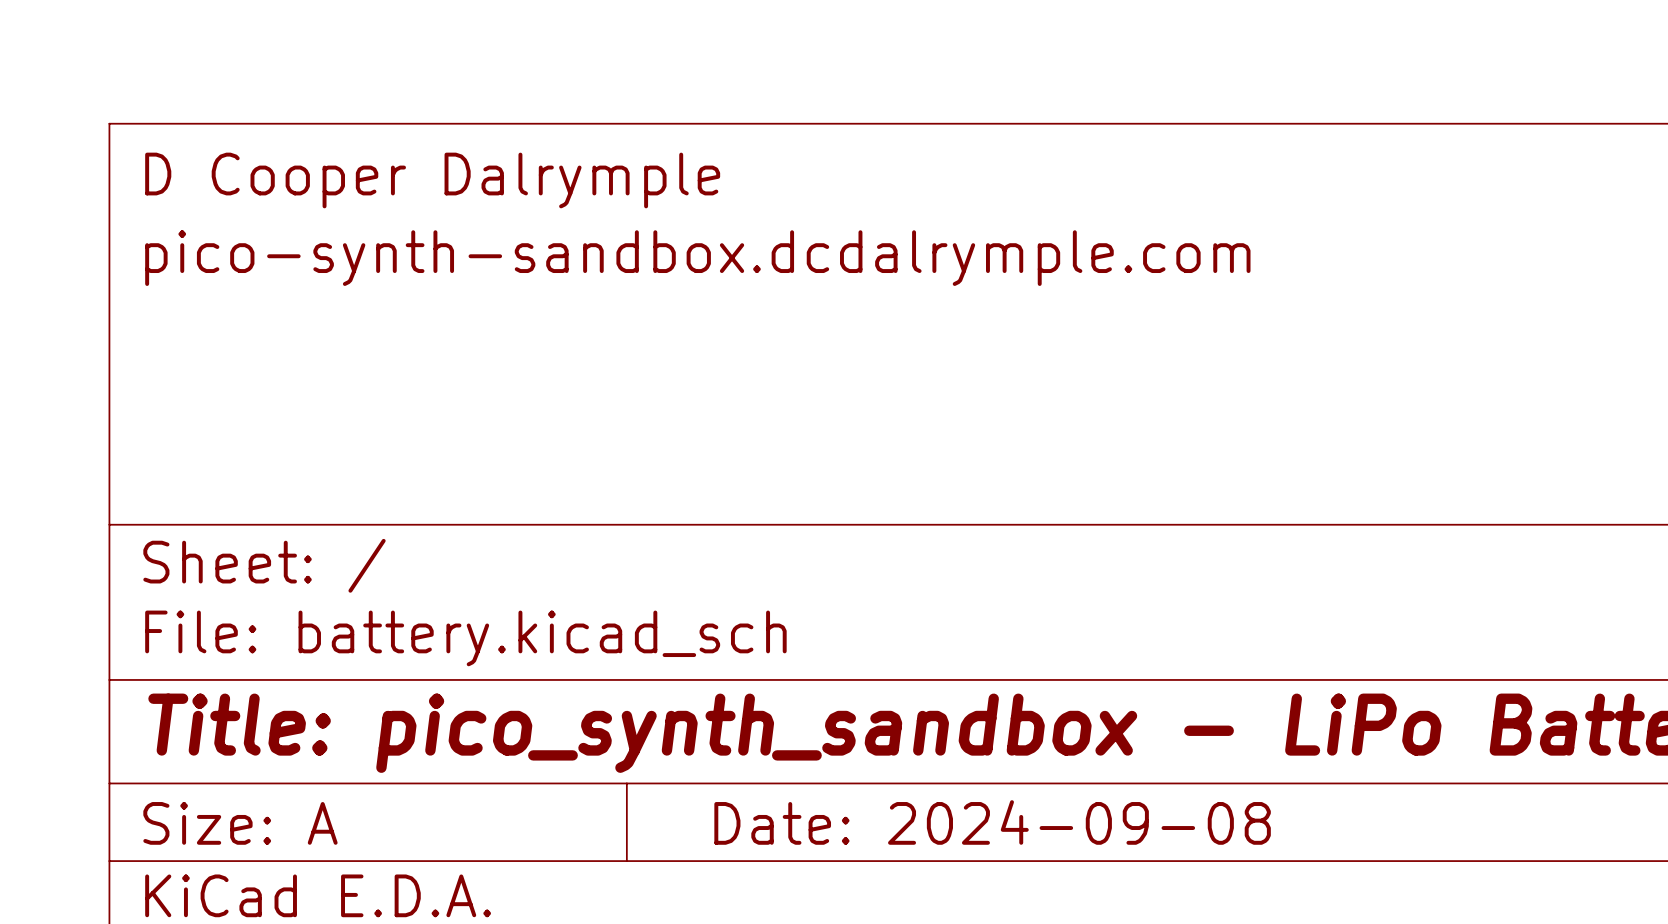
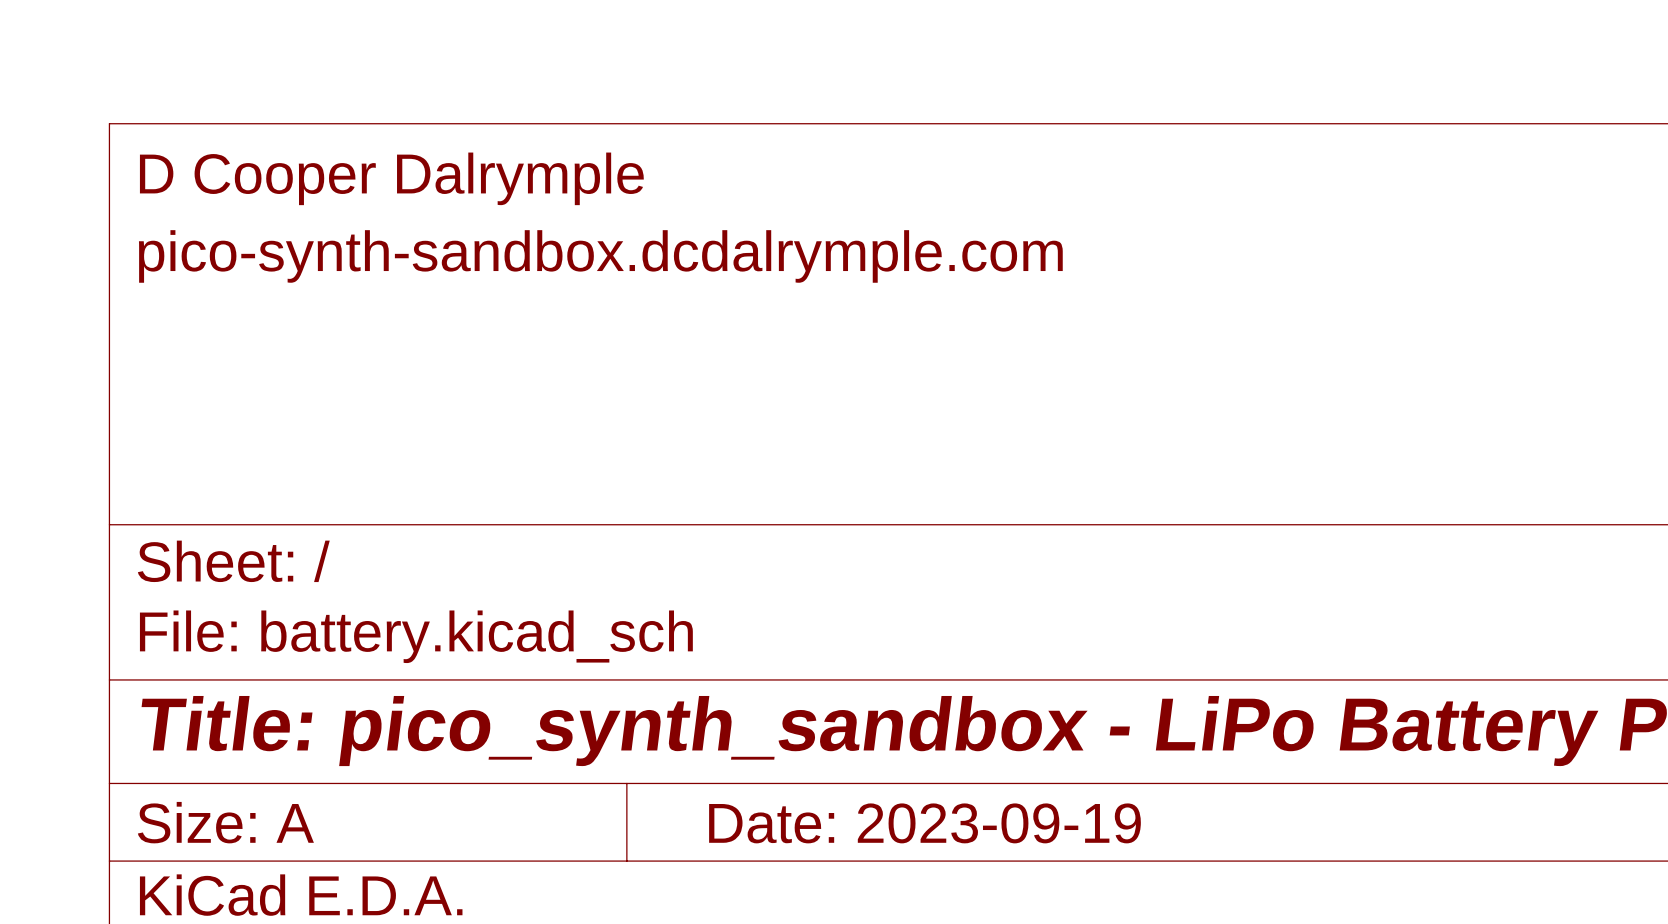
title block: Date: 2024-09-08 (992, 822) -> Date: 2023-09-19 (924, 823)

